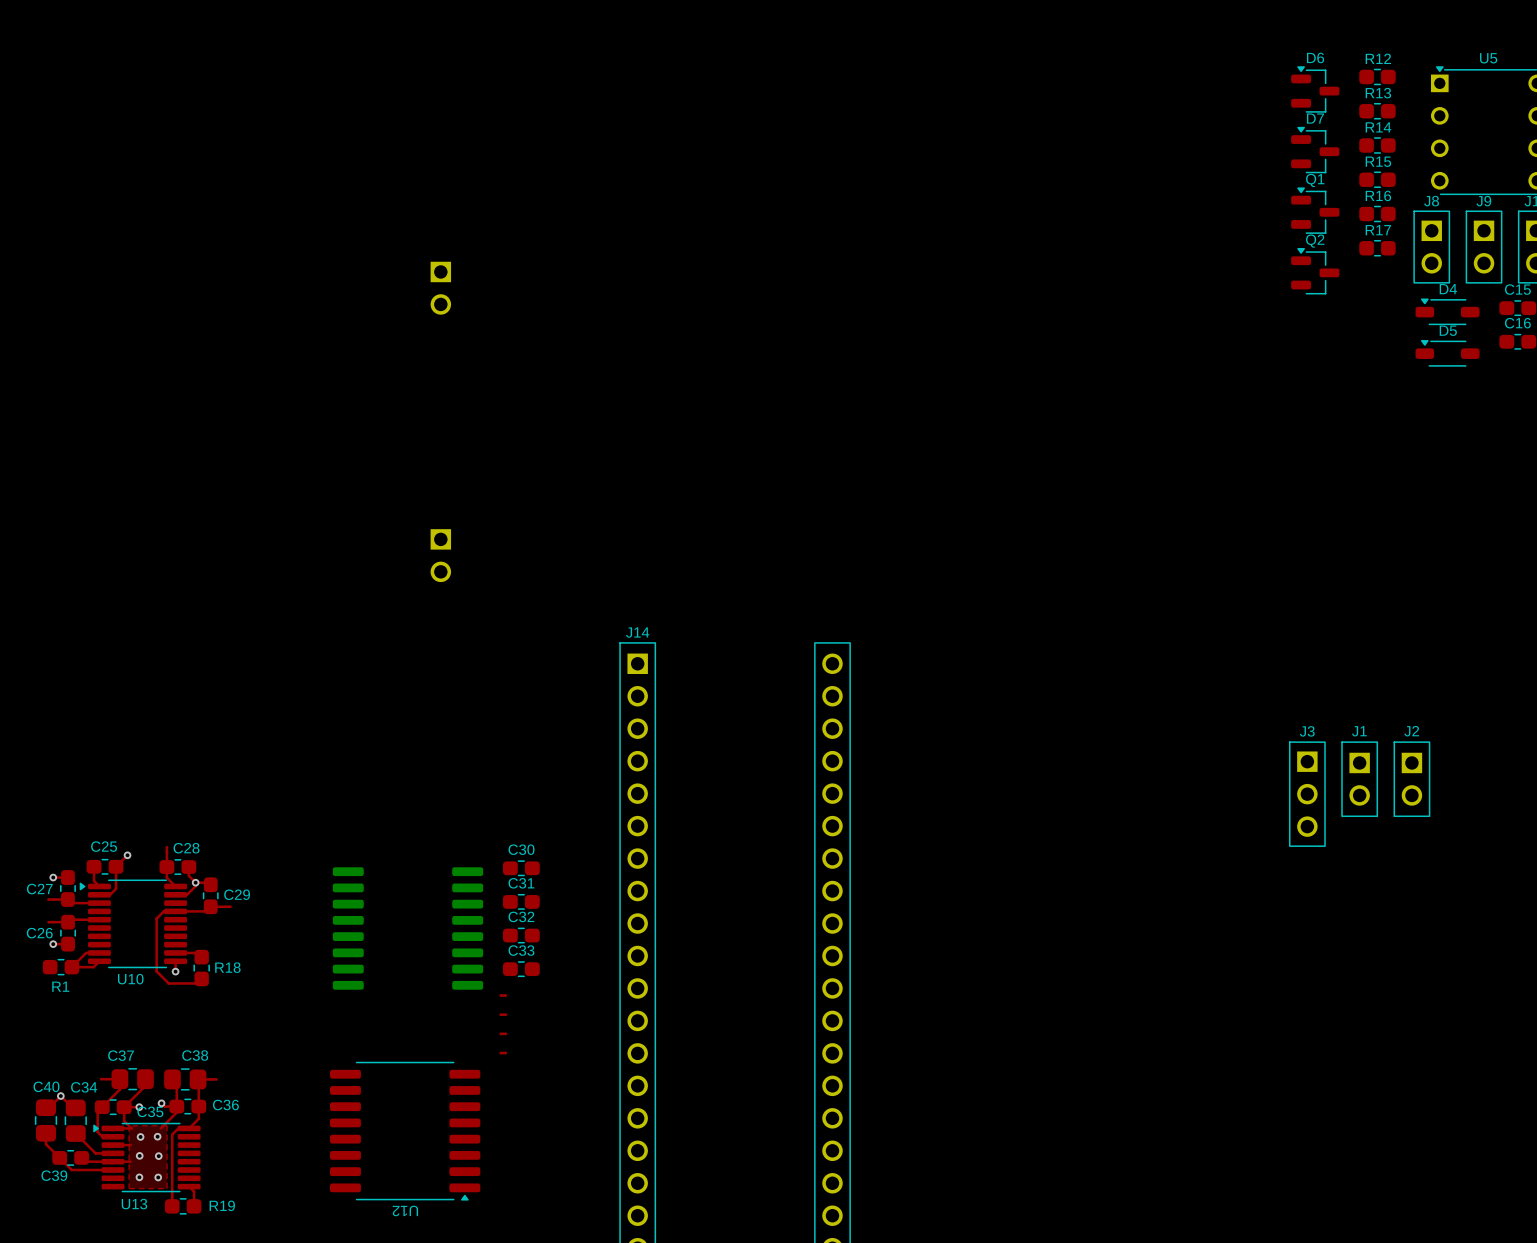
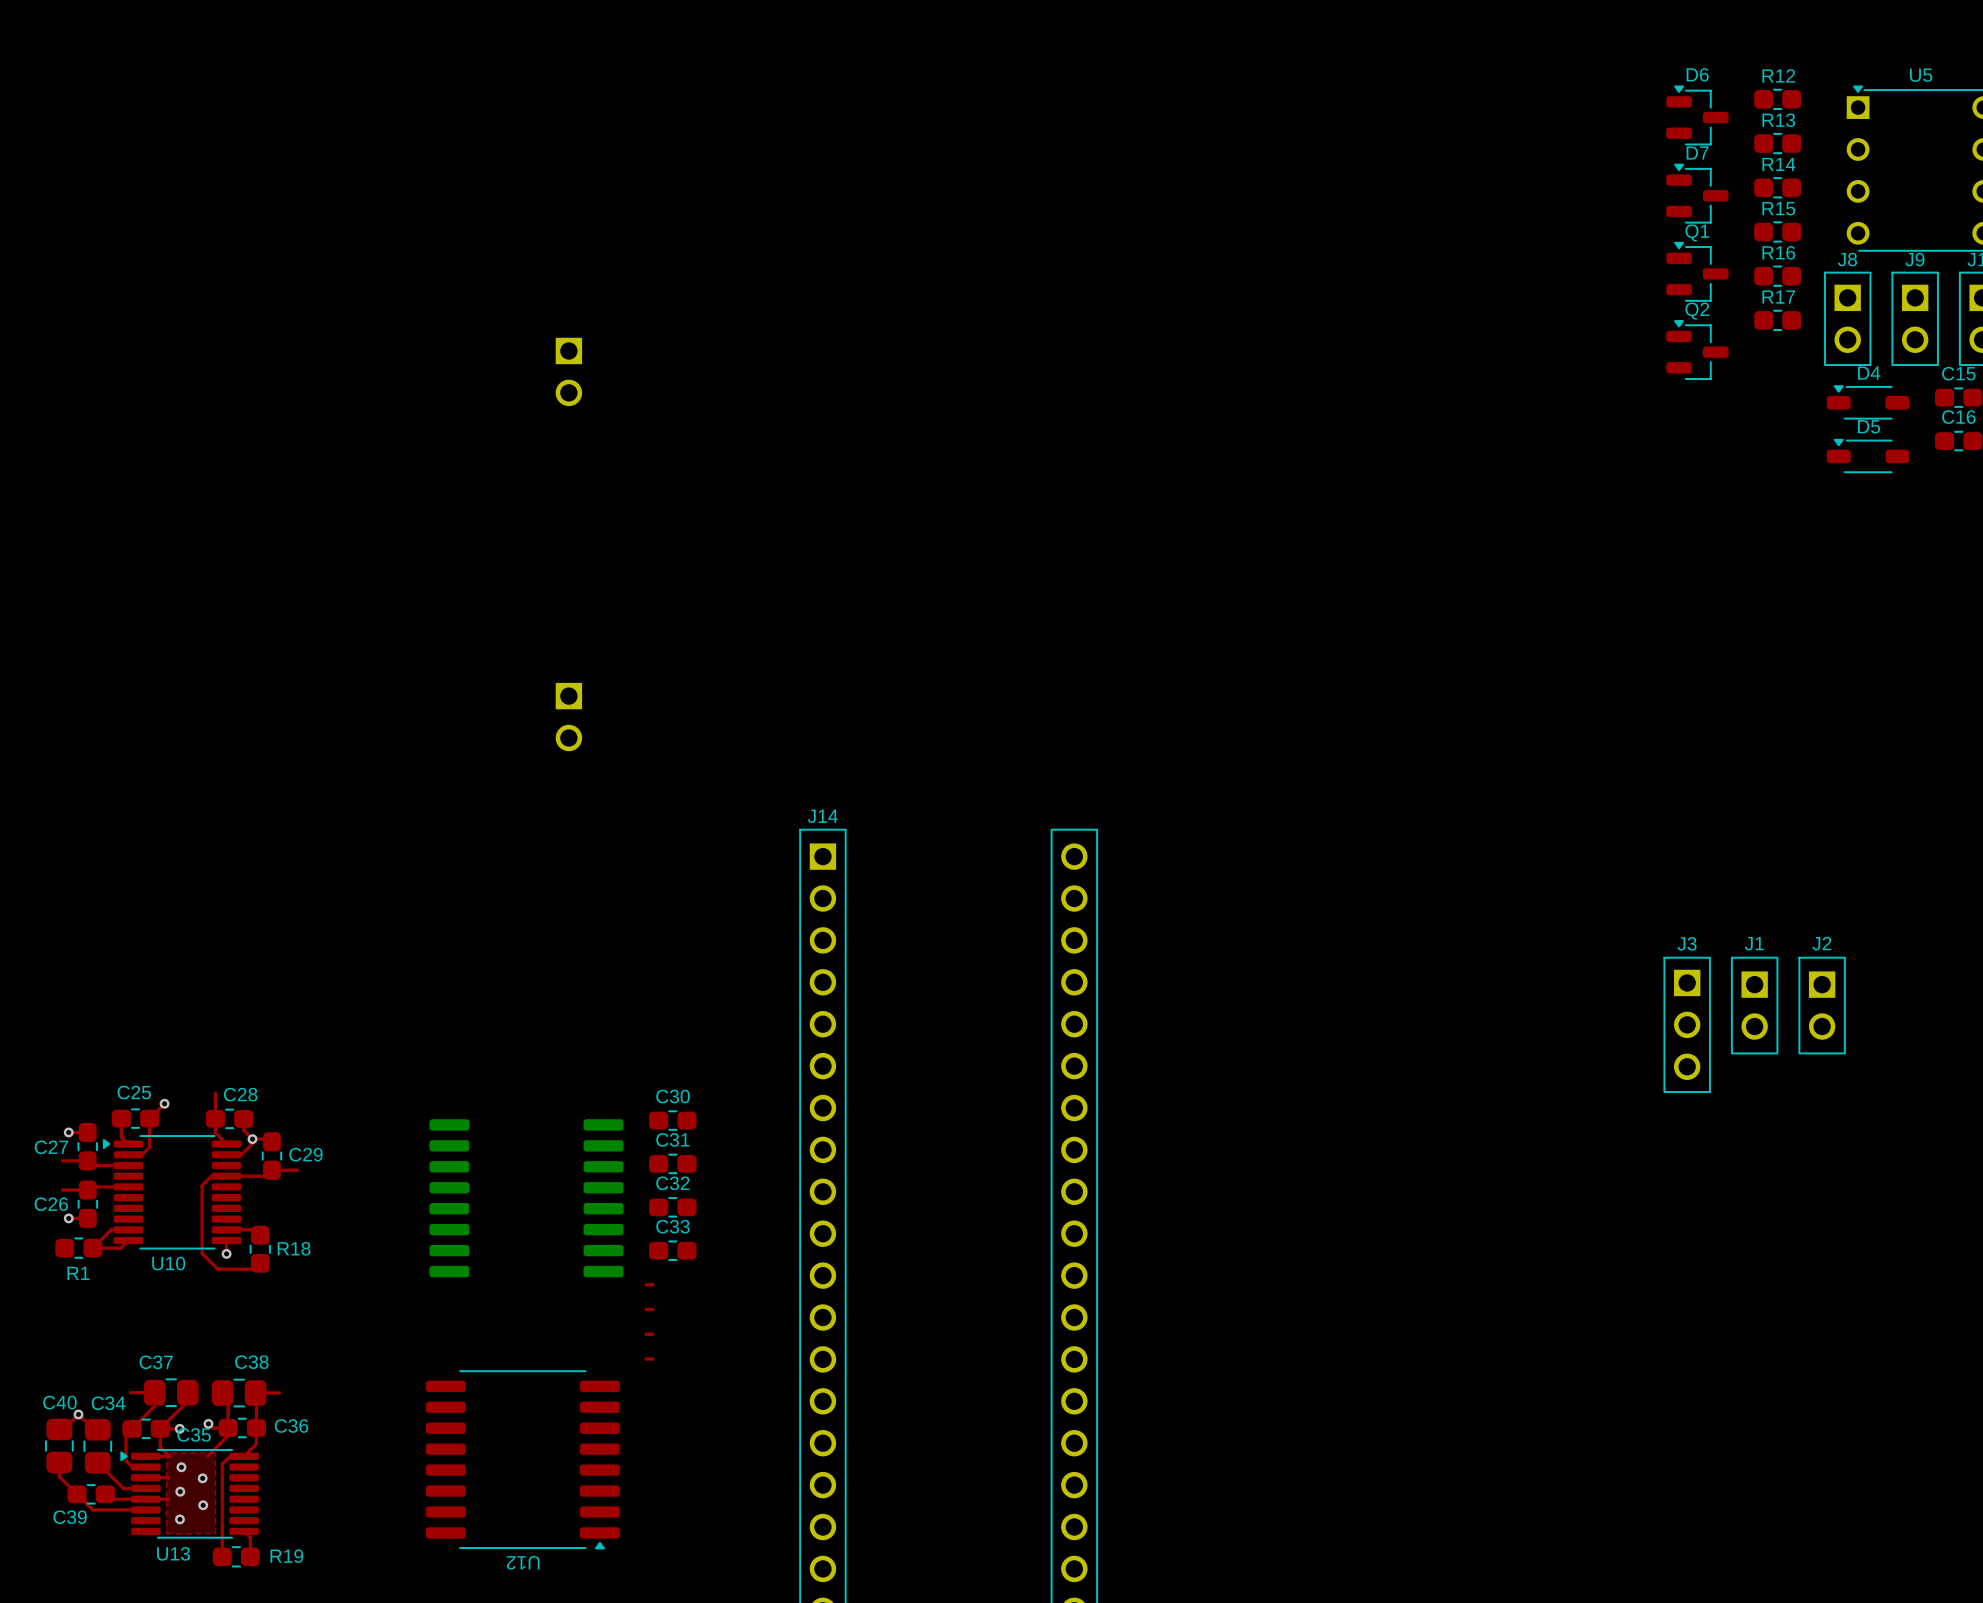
via: (157, 1136) -> none
via: none -> (202, 1478)
via: (158, 1156) -> none
via: none -> (203, 1505)
via: (158, 1177) -> none

